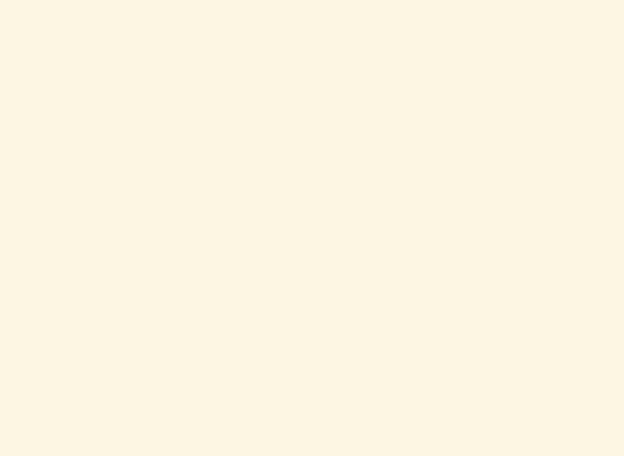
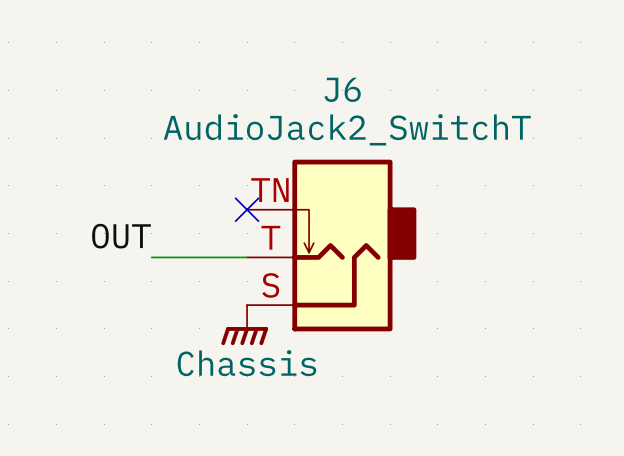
no-connect mark: none -> (247, 209)
label: none -> OUT (121, 236)
J6: none -> AudioJack2_SwitchT (331, 245)
wire: none -> (151, 257) (247, 257)
power symbol: none -> Chassis (244, 325)

